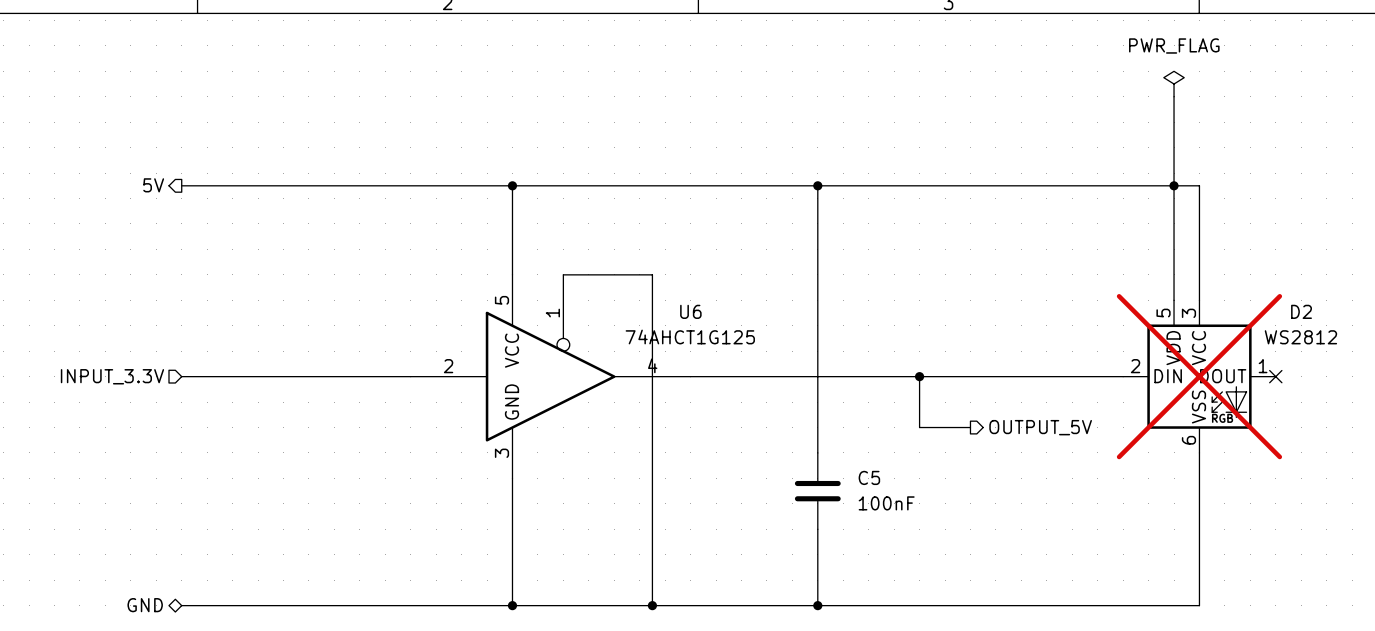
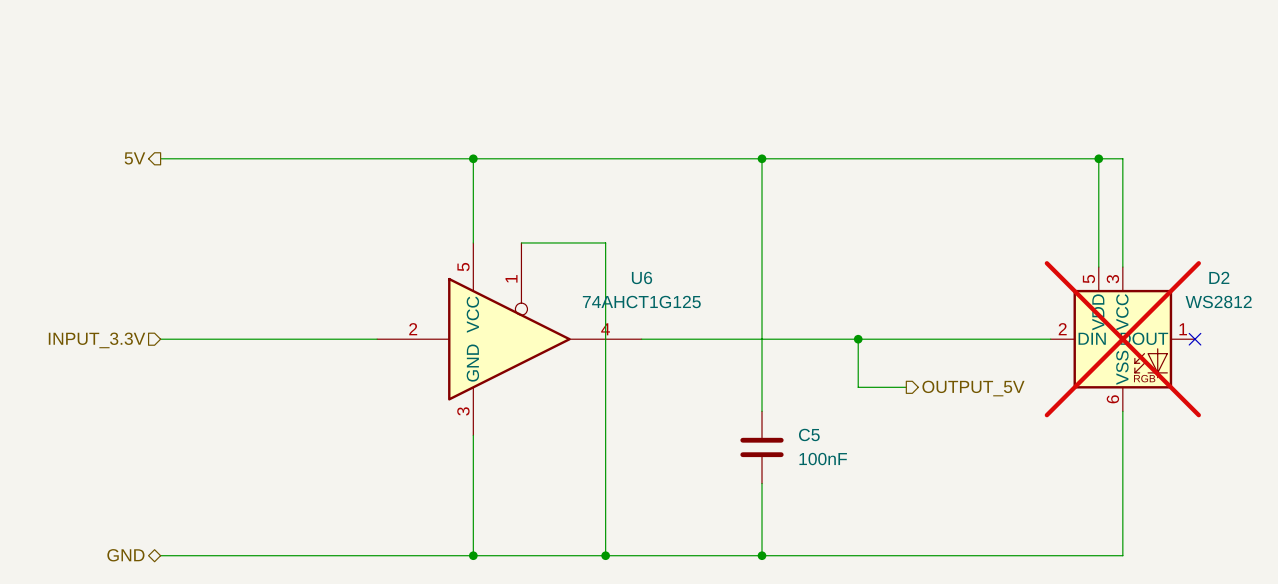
power symbol: PWR_FLAG (1174, 84) -> none
wire: (1174, 96) (1174, 185) -> none

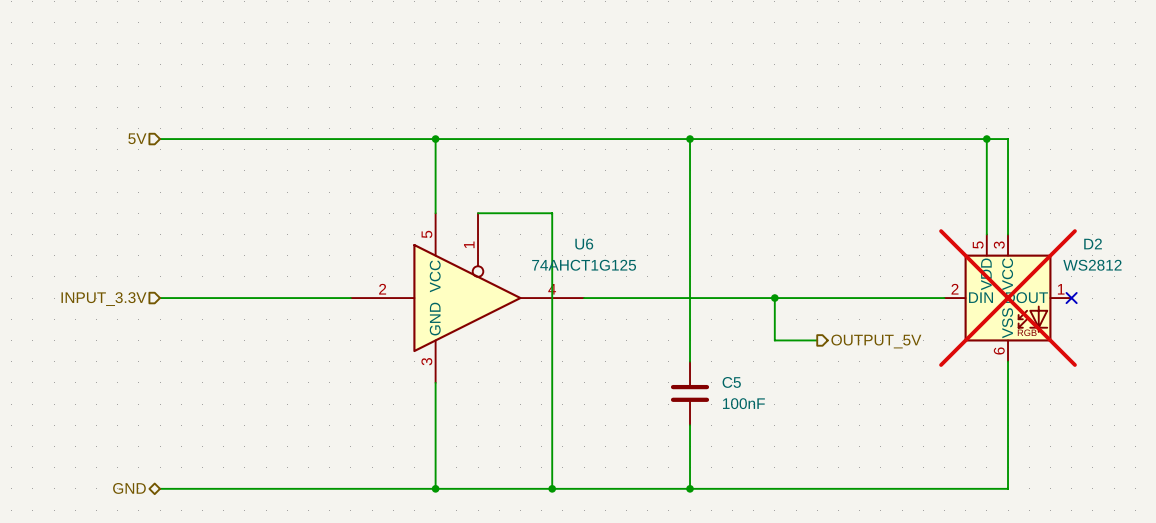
hierarchical label shape: output (134, 158) -> input (137, 138)

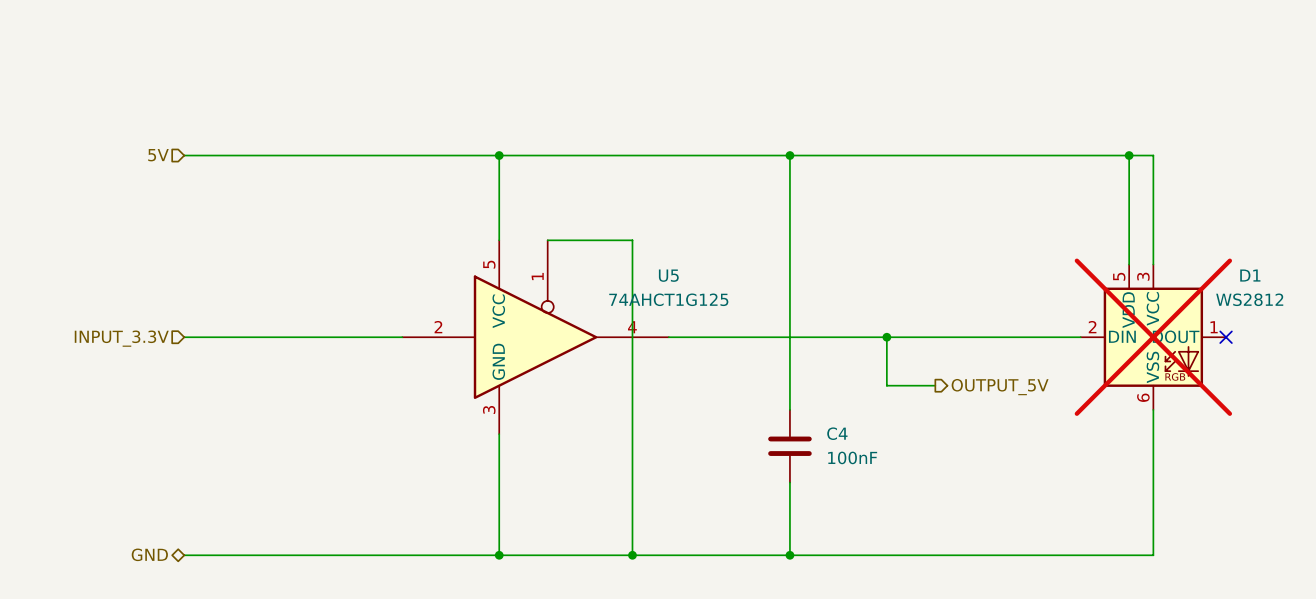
D2 name: D2 (1093, 243) -> D1 (1250, 275)
U6 name: U6 (584, 244) -> U5 (668, 275)
C5 name: C5 (731, 382) -> C4 (837, 433)

